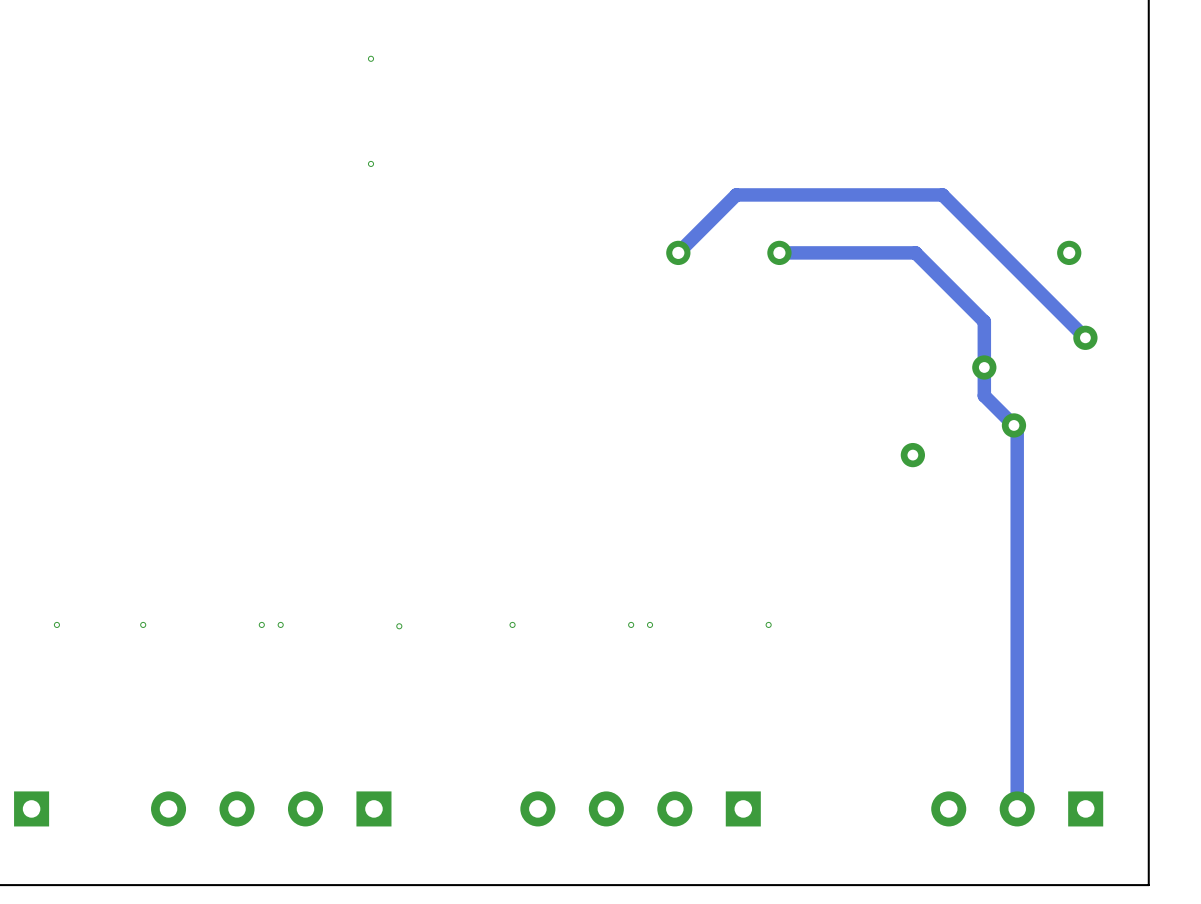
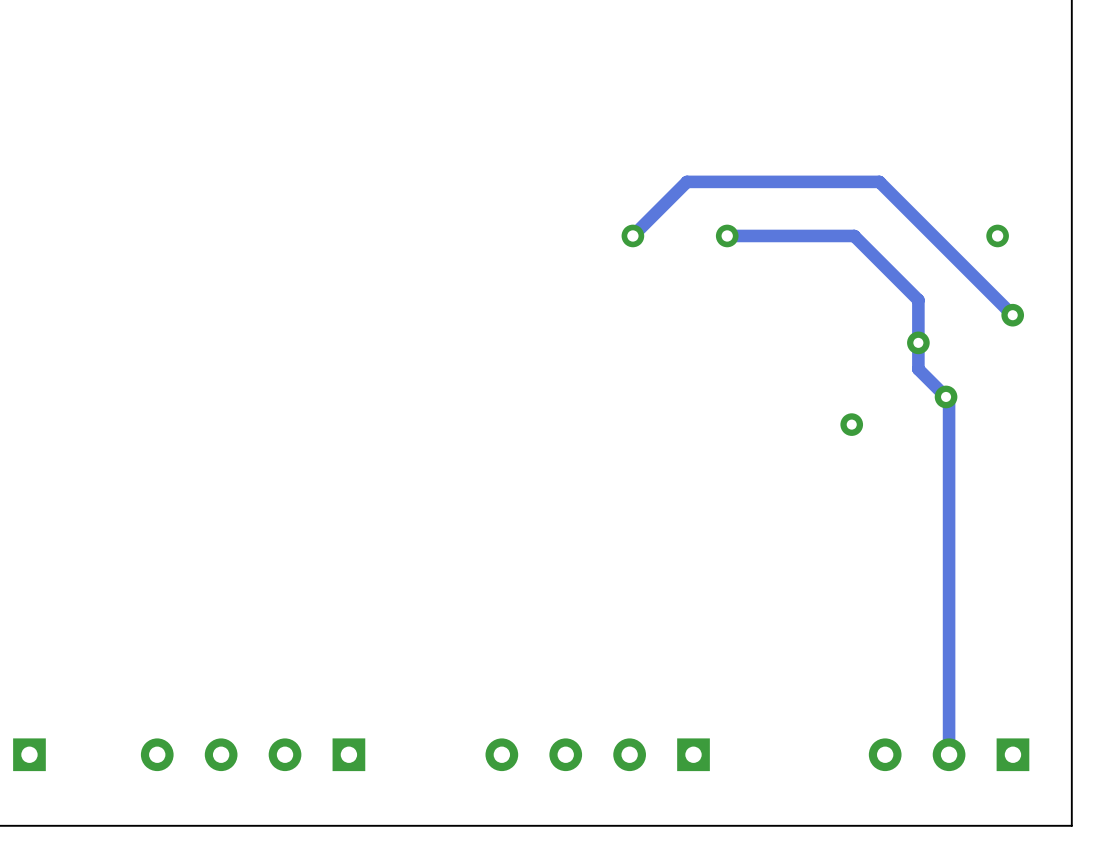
via: (371, 58) -> none
via: (371, 163) -> none
via: (56, 624) -> none
via: (143, 624) -> none
via: (261, 624) -> none
via: (280, 624) -> none
via: (512, 624) -> none
via: (631, 624) -> none
via: (650, 624) -> none
via: (768, 624) -> none
via: (399, 626) -> none

